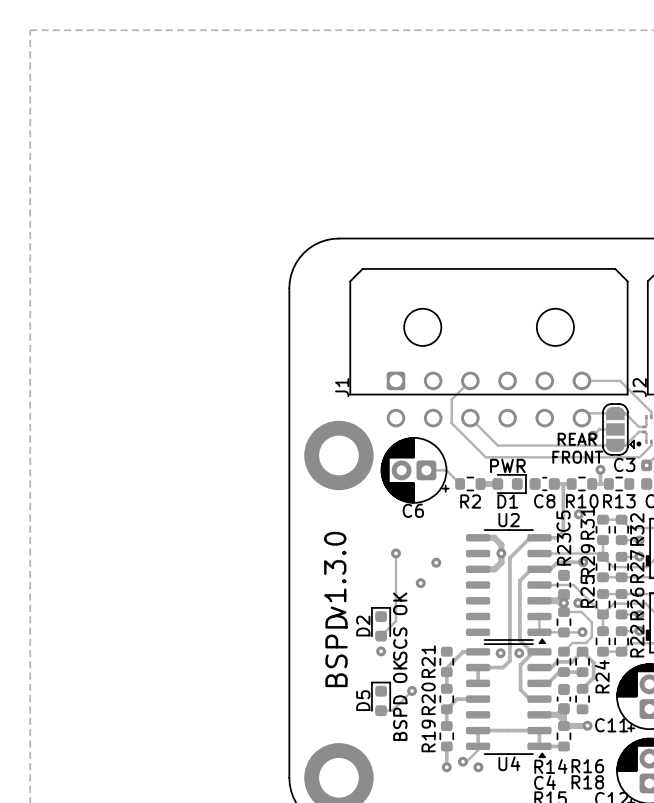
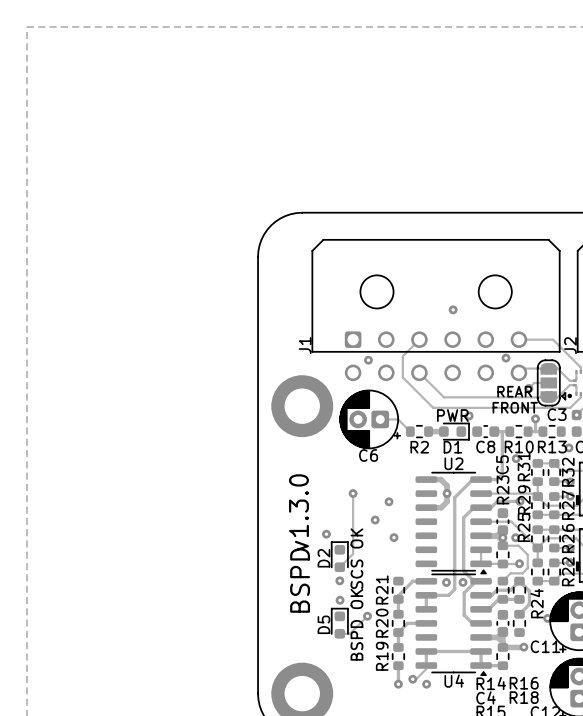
via: none -> (453, 309)
via: none -> (506, 358)
via: none -> (368, 360)
via: none -> (469, 415)
via: none -> (569, 447)
via: none -> (326, 534)
via: none -> (394, 537)
via: none -> (340, 600)
via: none -> (547, 618)

